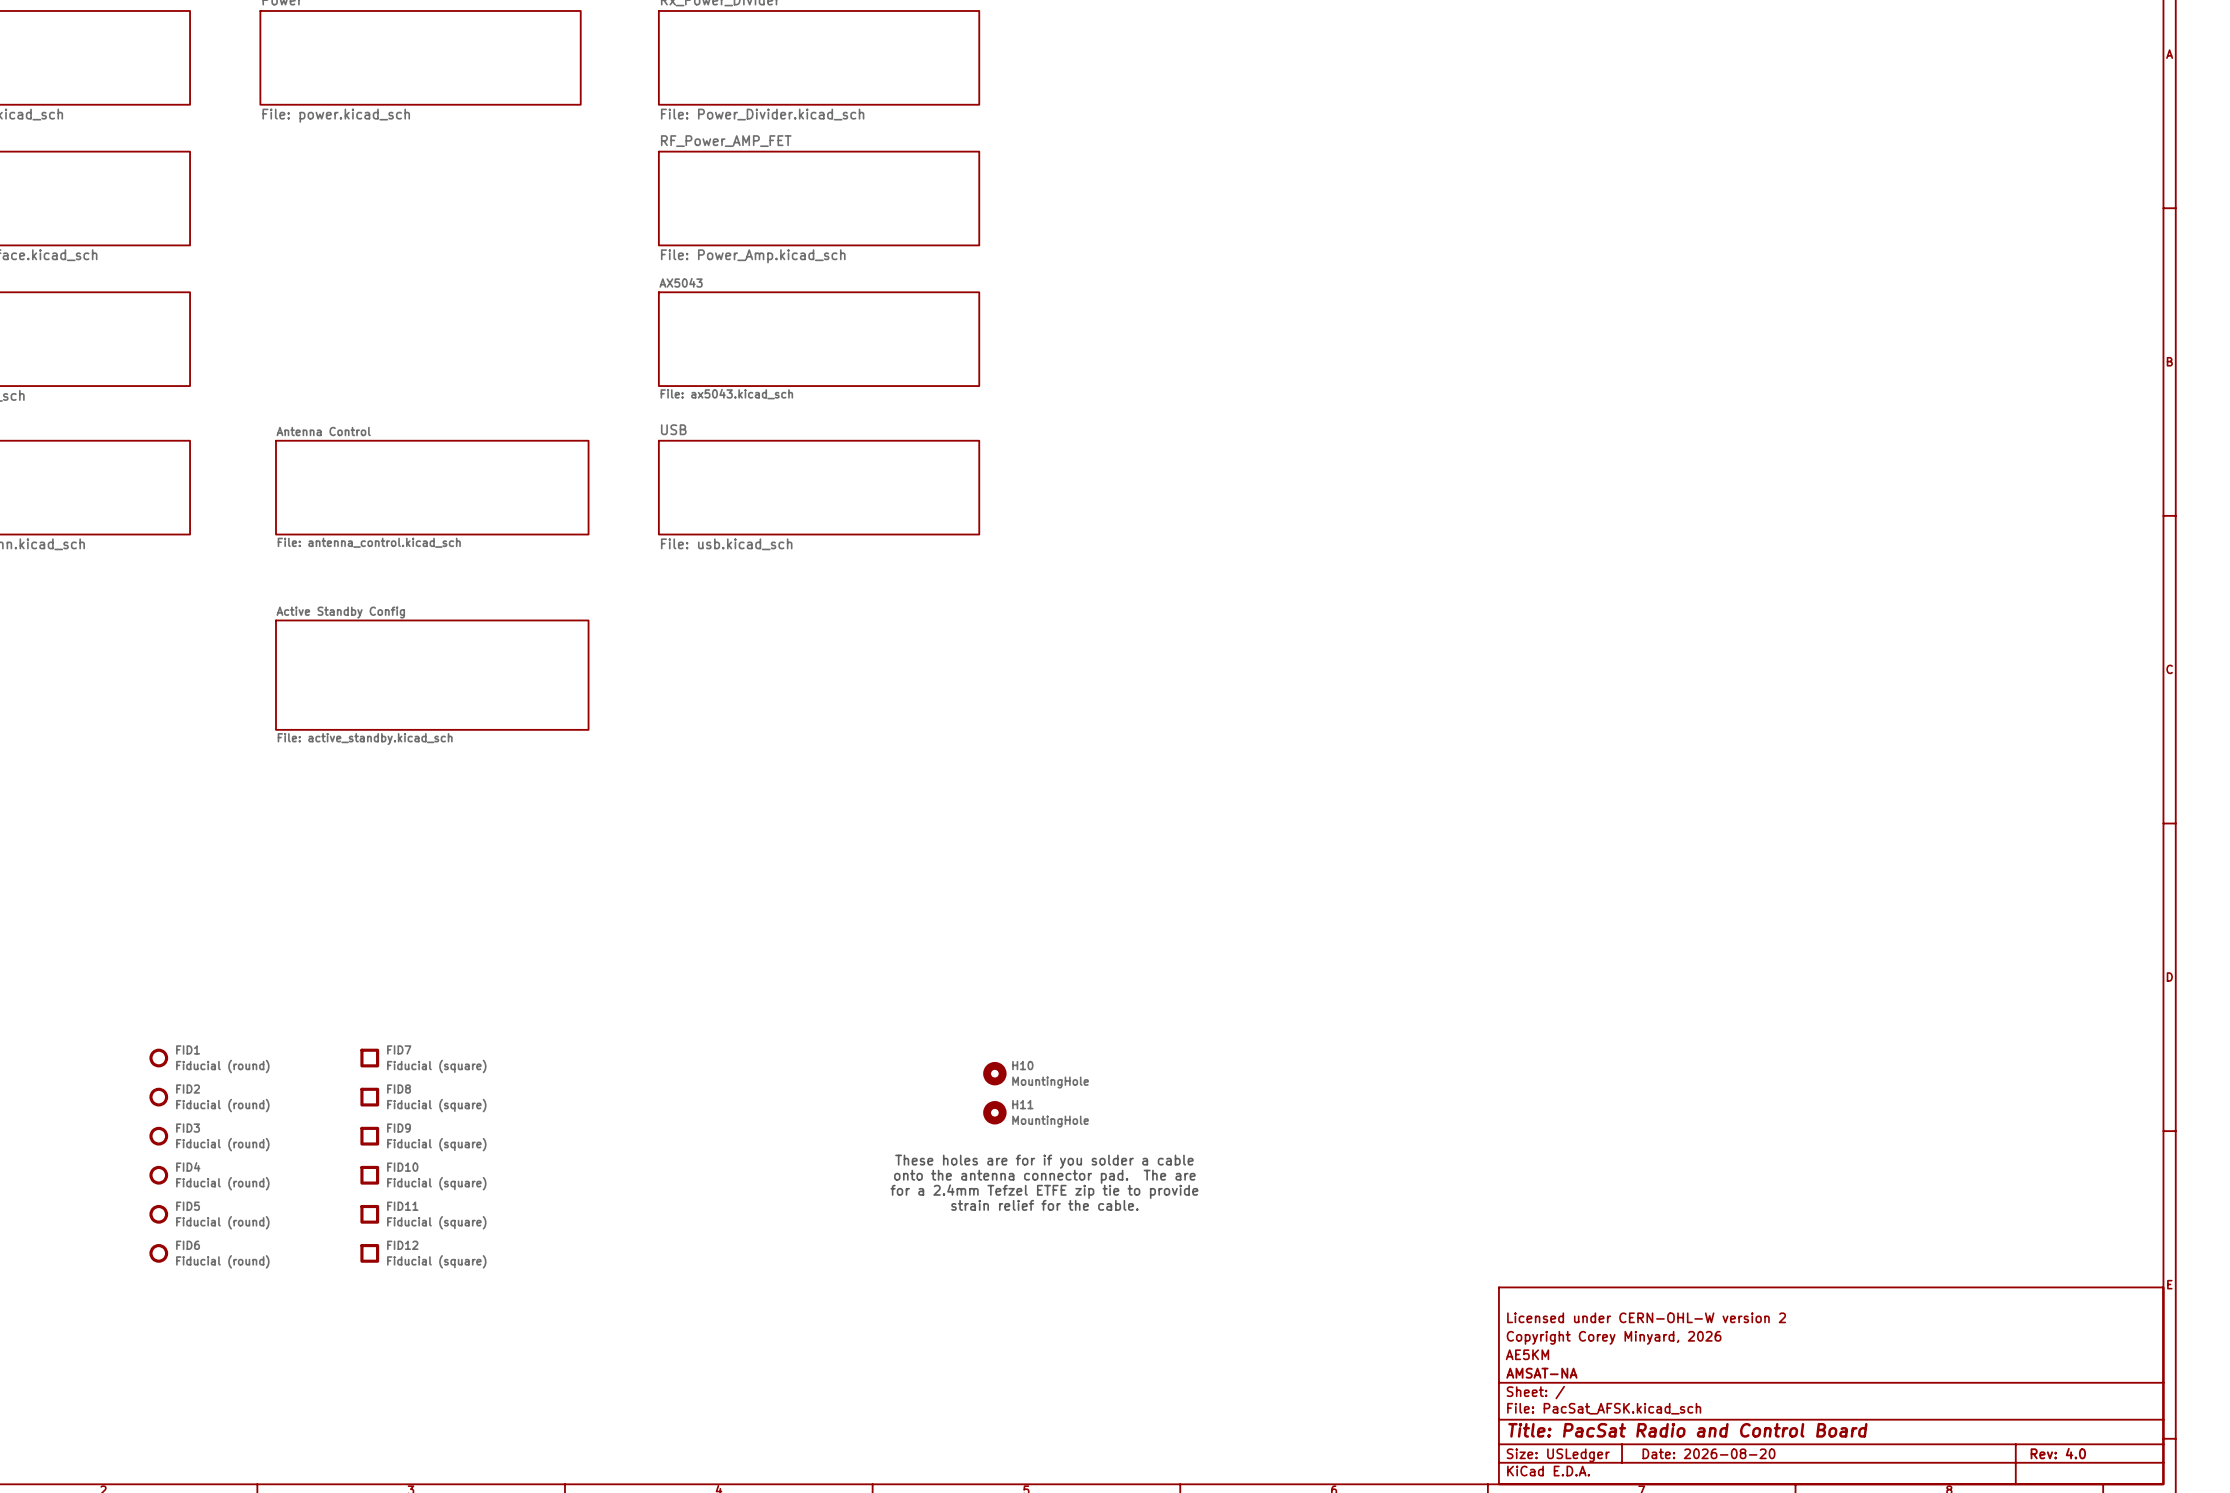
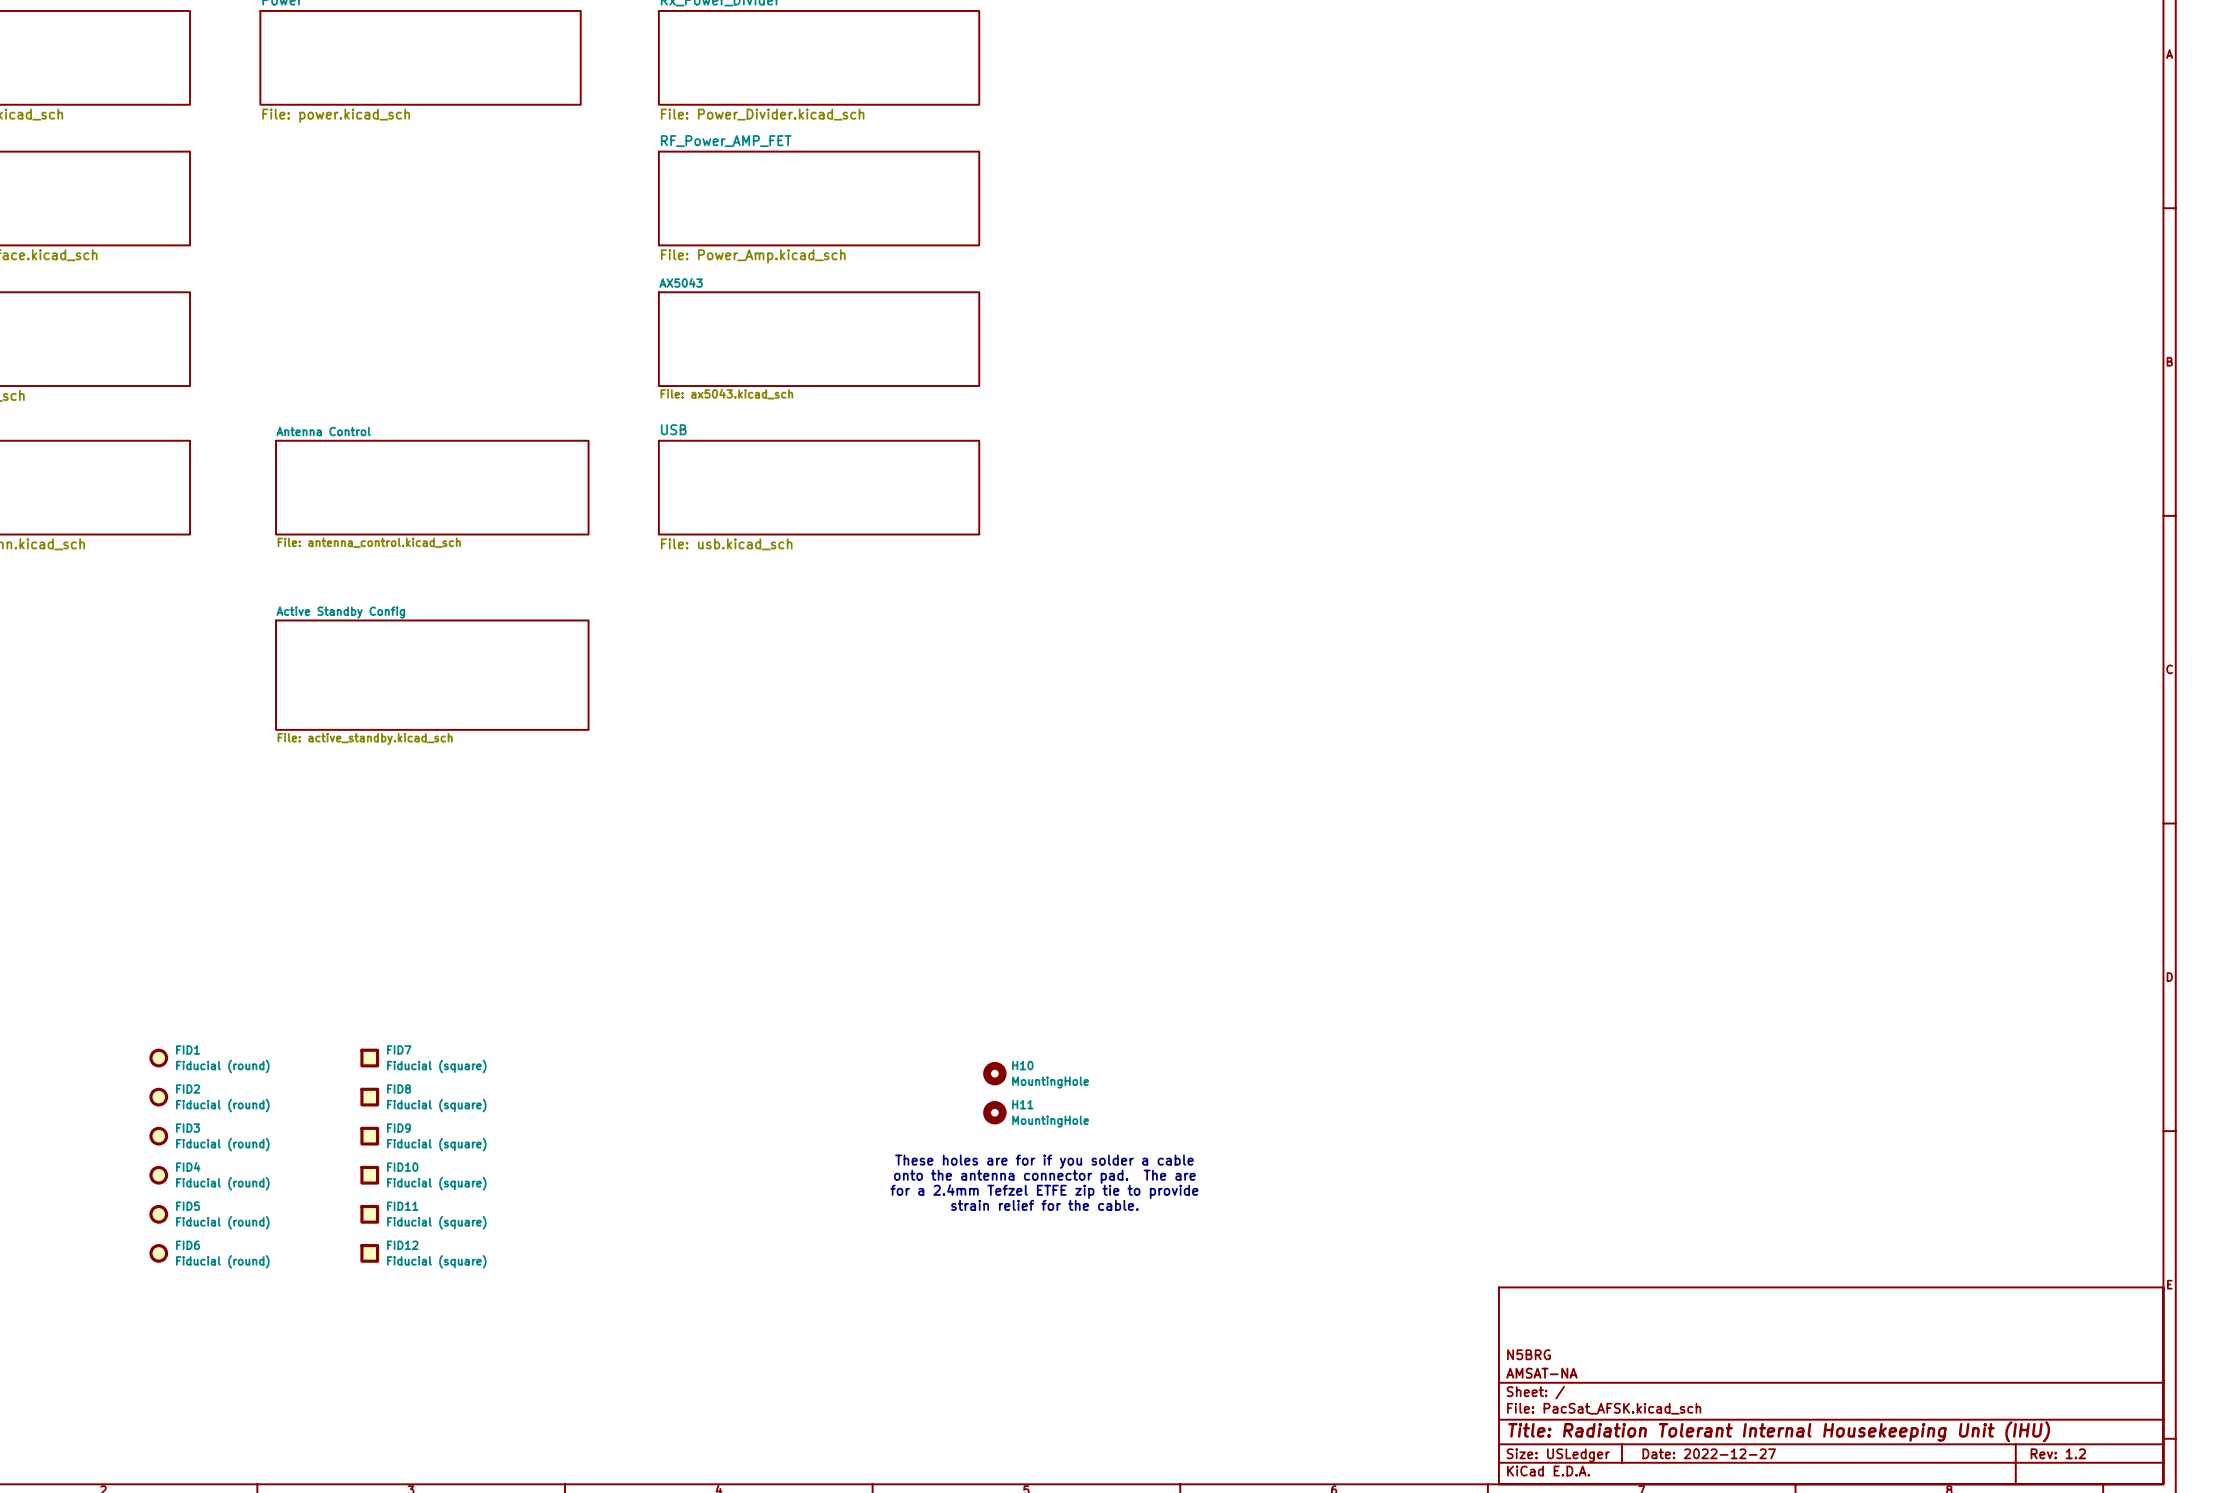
title block: Licensed under CERN-OHL-W version 2 (1646, 1317) -> none
title block: Copyright Corey Minyard, 2026 (1614, 1337) -> none
title block: AE5KM (1527, 1354) -> N5BRG (1529, 1354)
title block: Title: PacSat Radio and Control Board (1687, 1430) -> Title: Radiation Tolerant Internal Housekeeping Unit (IHU) (1779, 1431)
title block: Date: 2026-08-20 (1708, 1453) -> Date: 2022-12-27 (1709, 1453)
title block: Rev: 4.0 (2058, 1453) -> Rev: 1.2 (2058, 1453)

